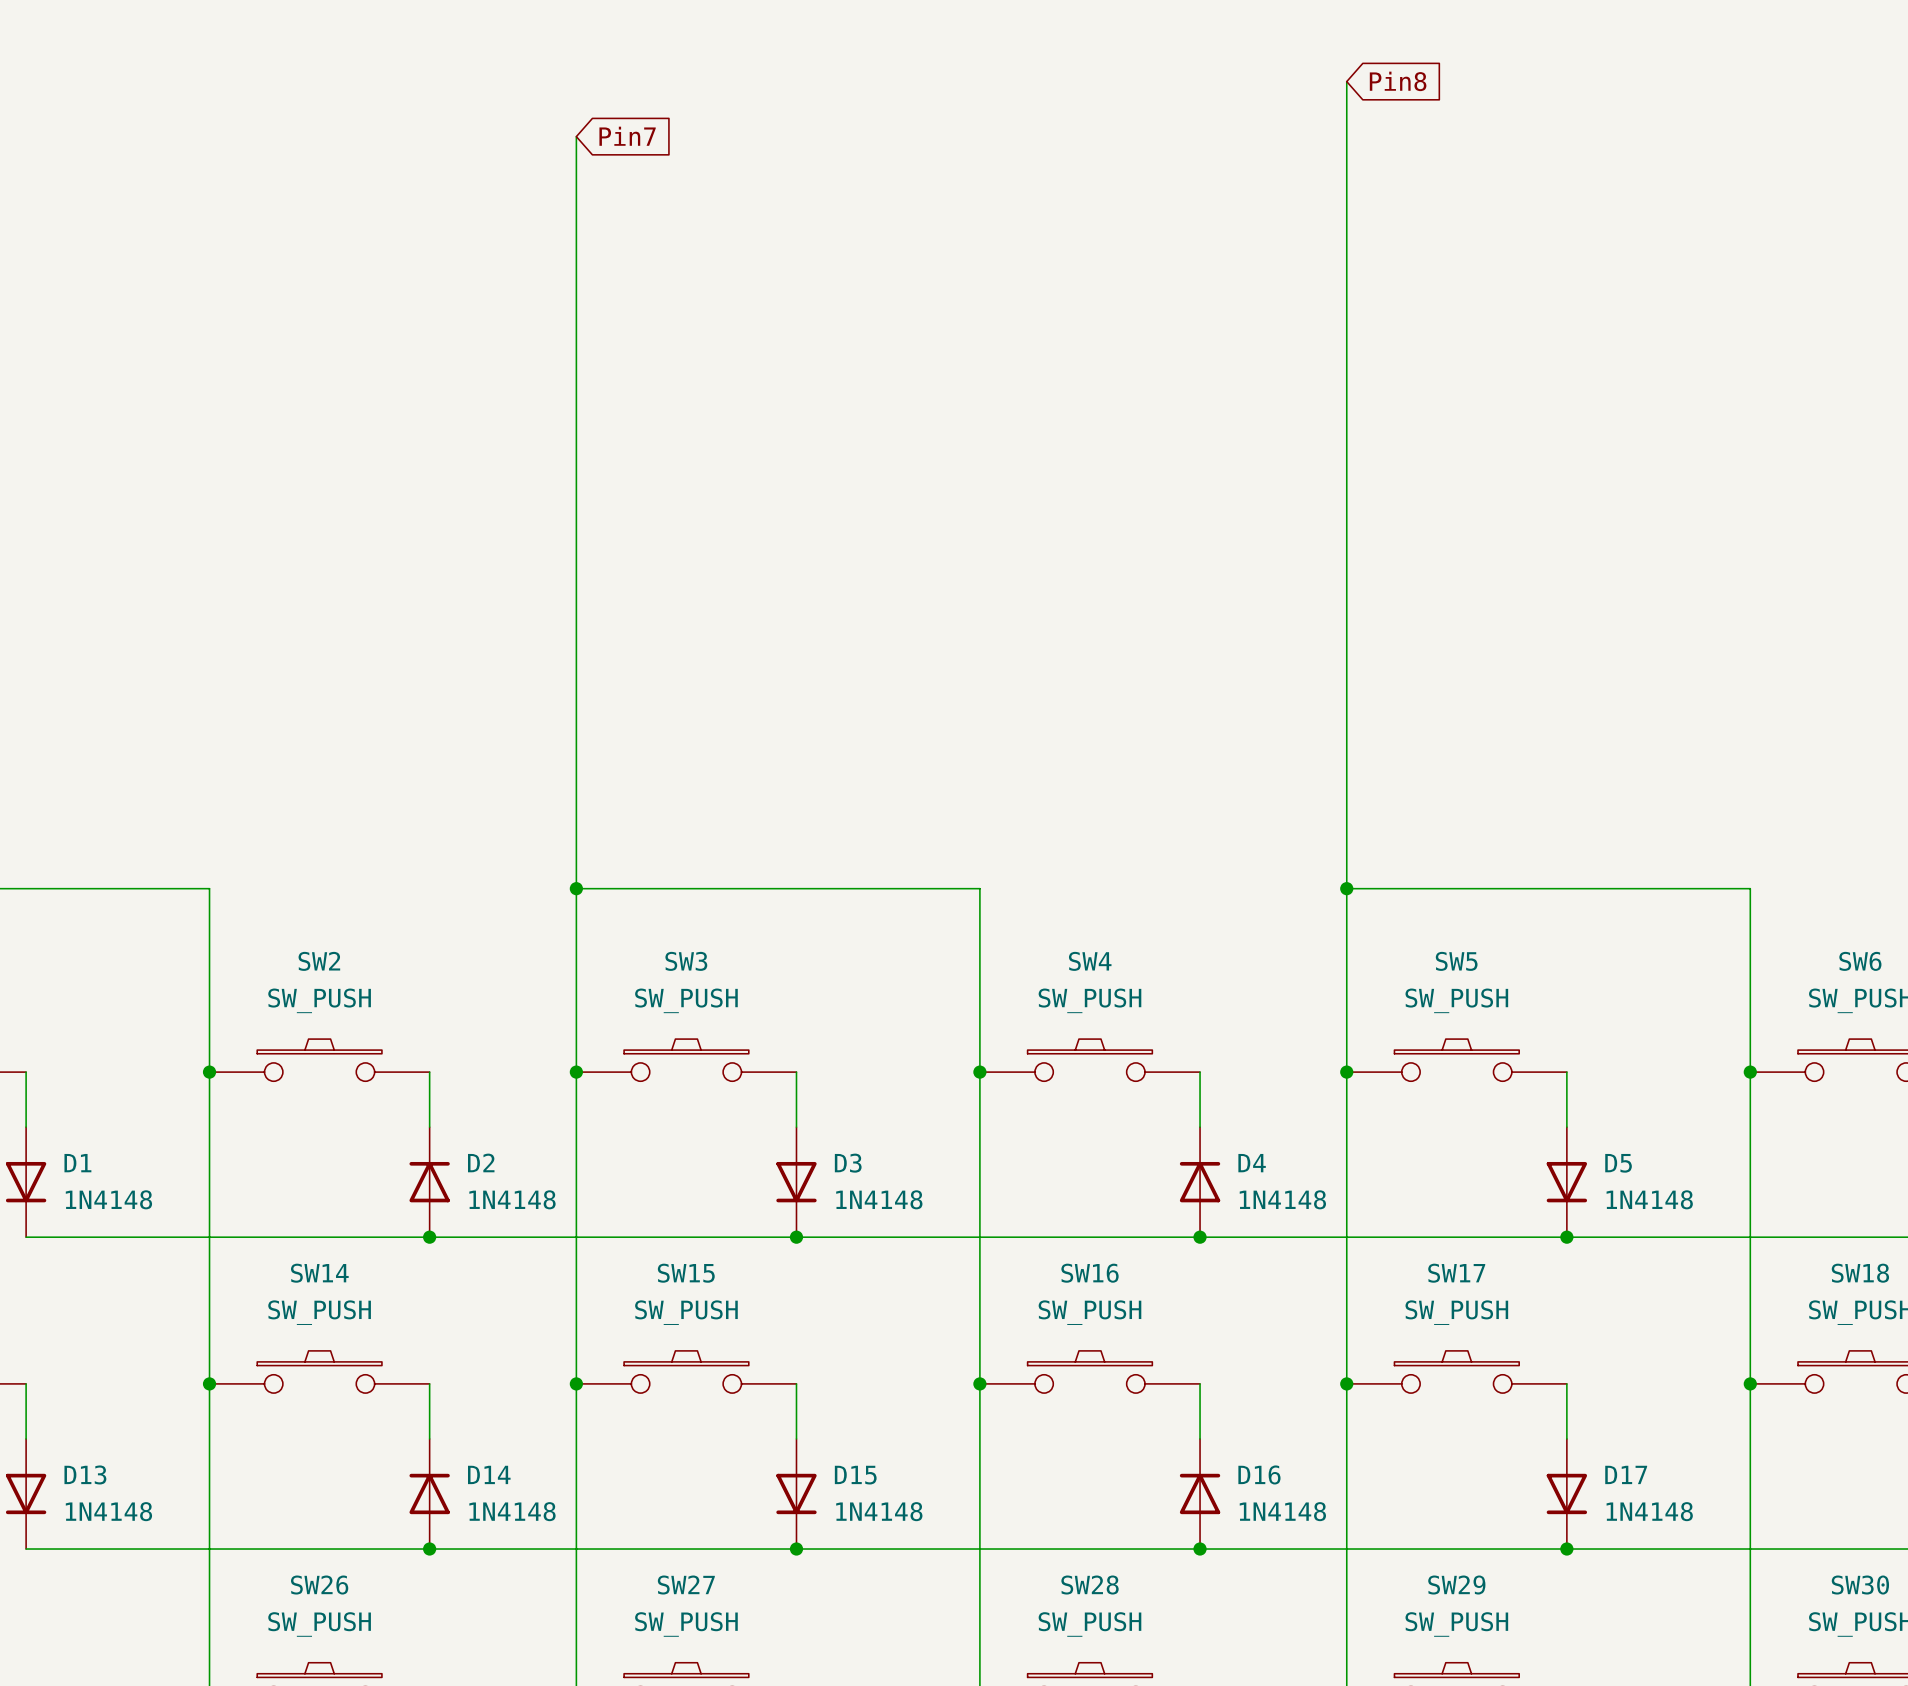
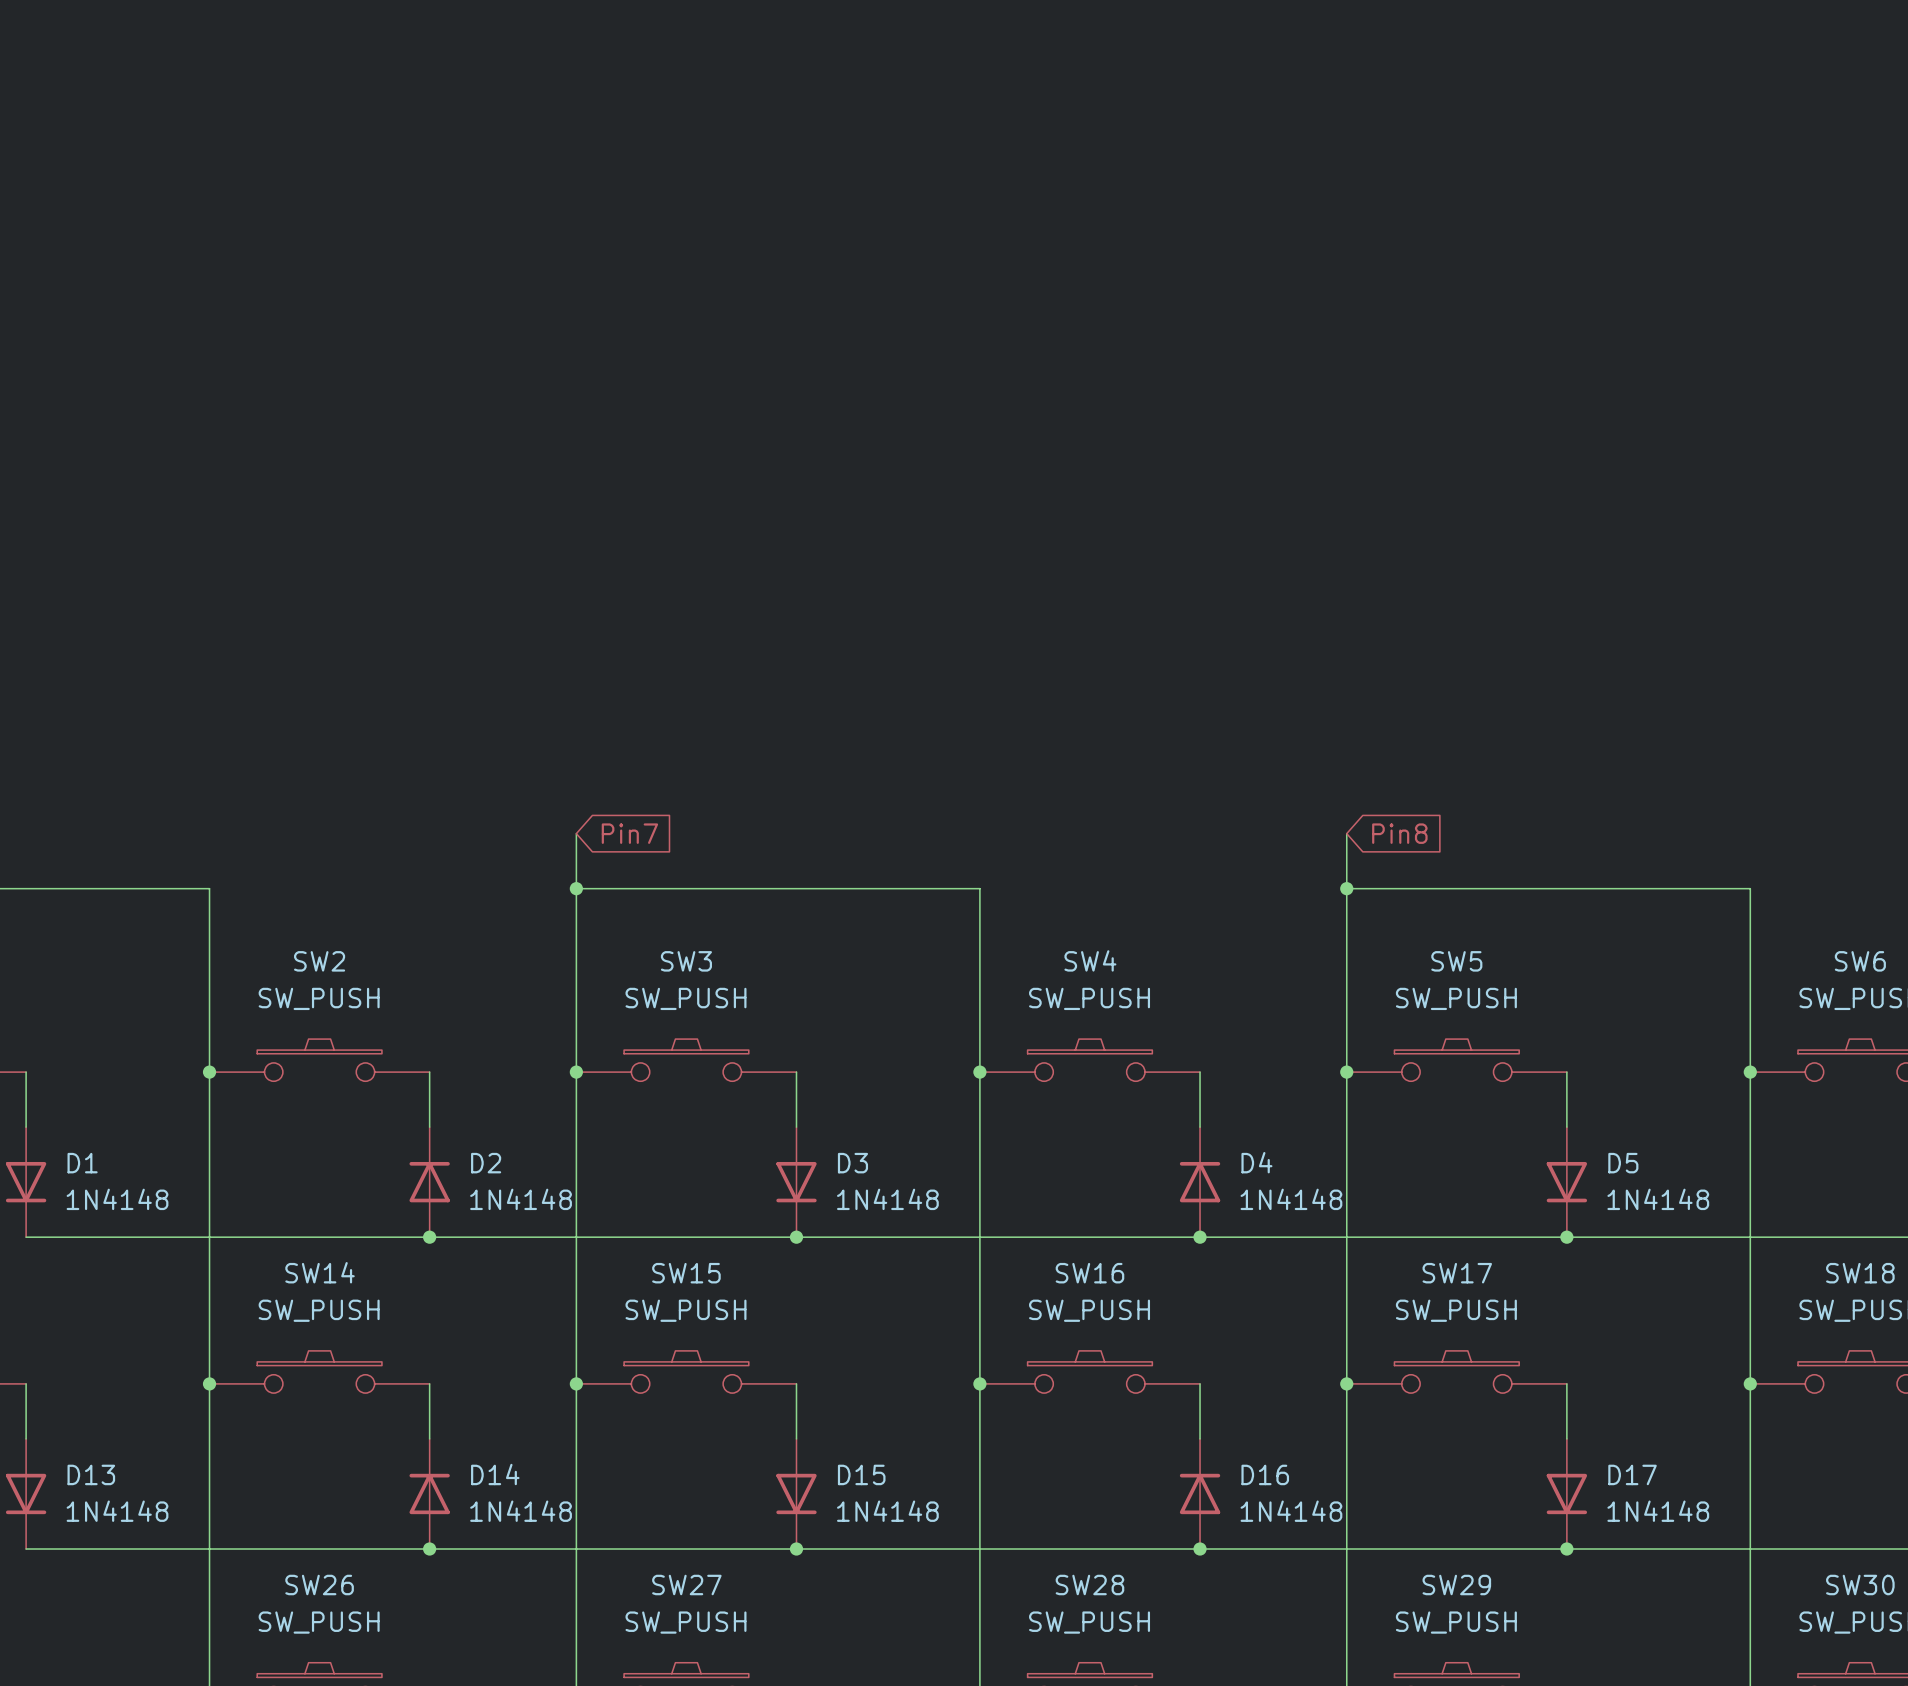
wire: (1346, 81) (1346, 833) -> none
global label: Pin8 (1398, 81) -> none
wire: (576, 136) (576, 833) -> none
global label: Pin7 (627, 136) -> none
global label: none -> Pin7 (629, 833)
global label: none -> Pin8 (1399, 833)

